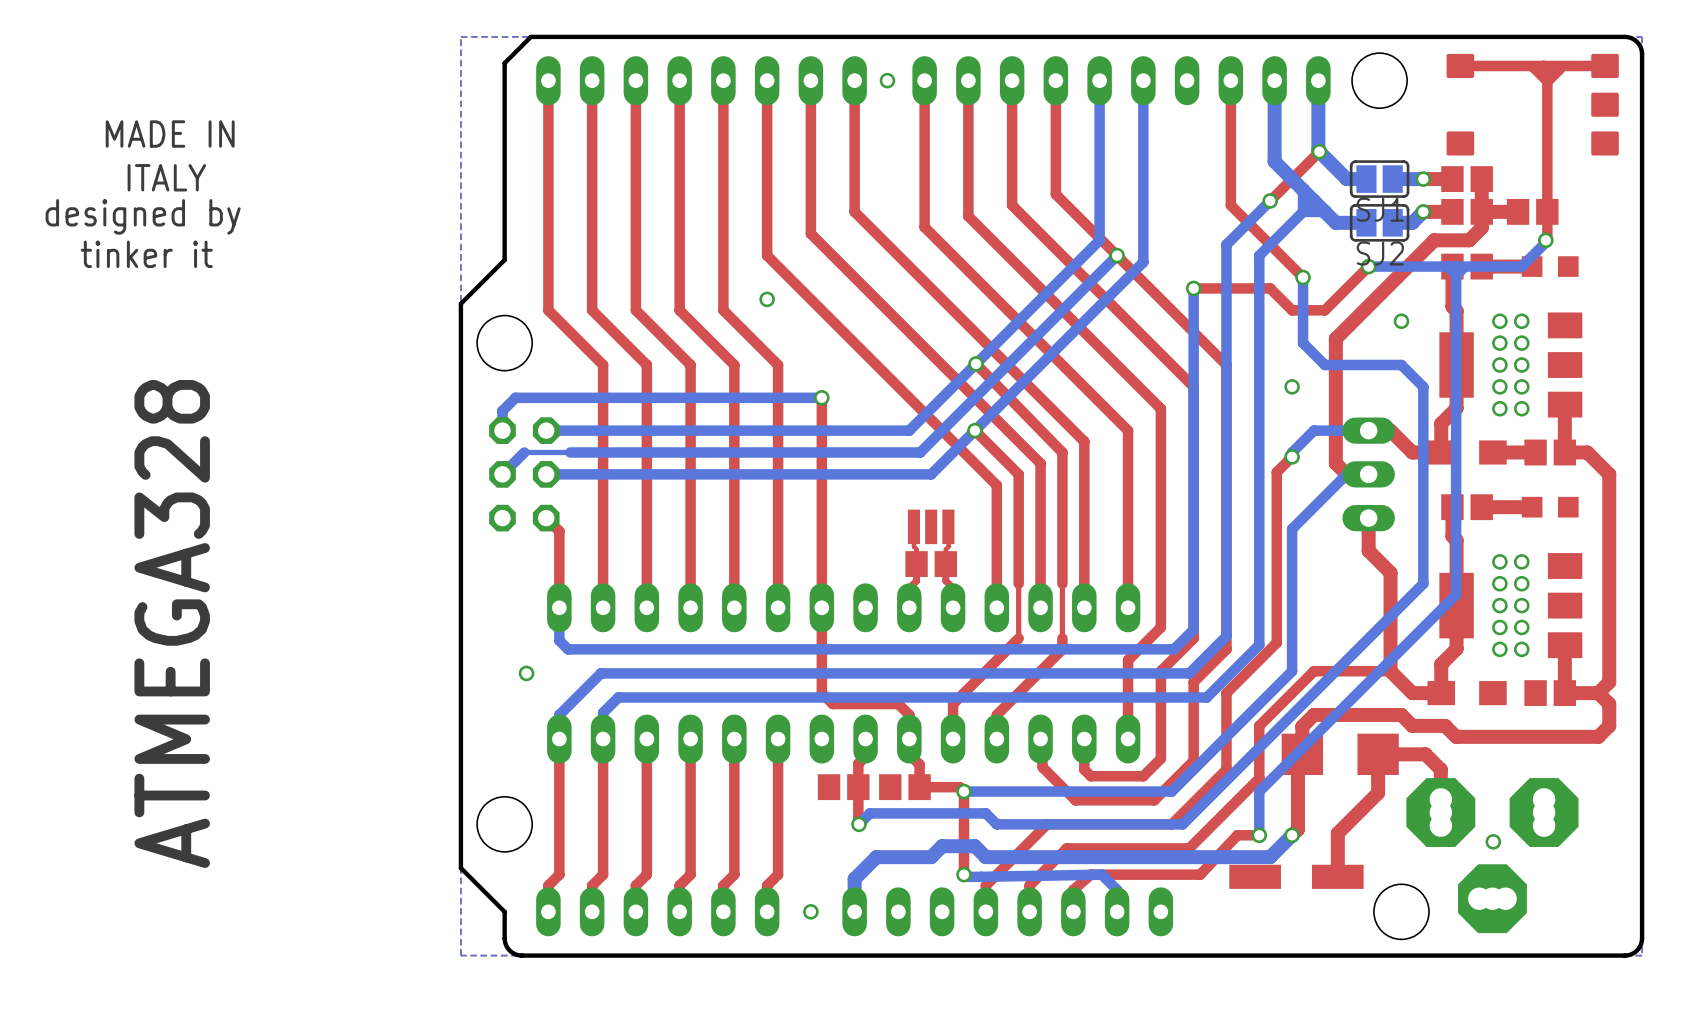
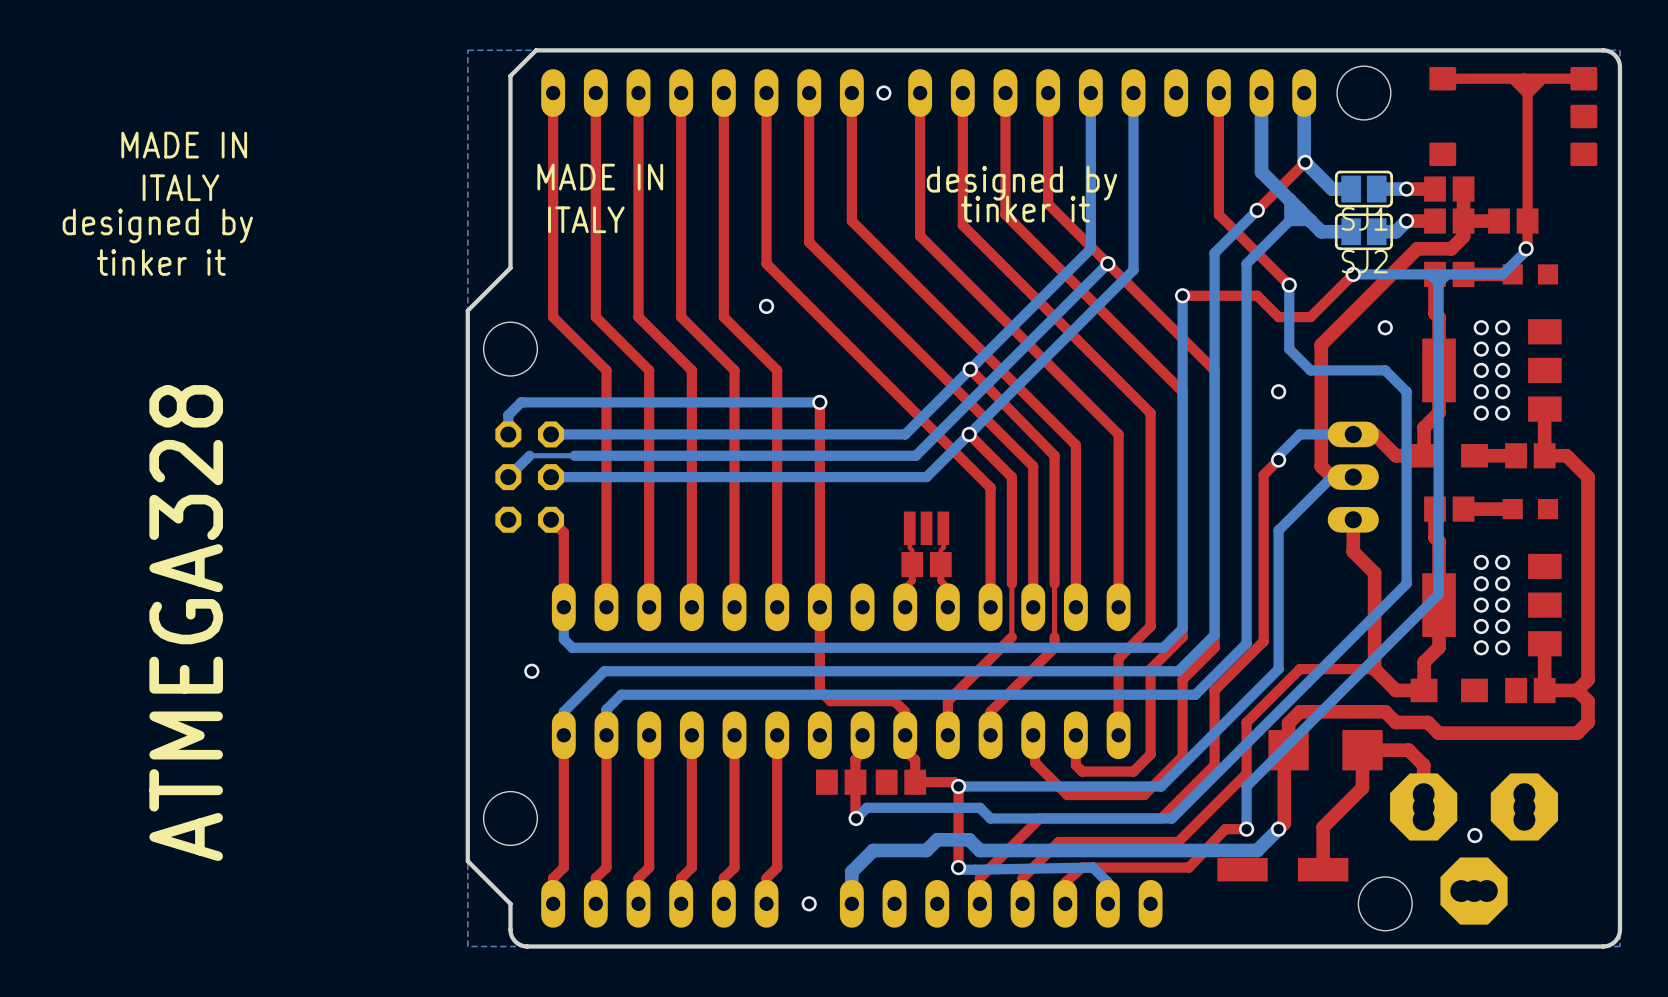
text: none -> MADE IN (600, 177)
text: none -> designed by (1021, 183)
text: none -> tinker it (1025, 209)
text: none -> ITALY (586, 219)

